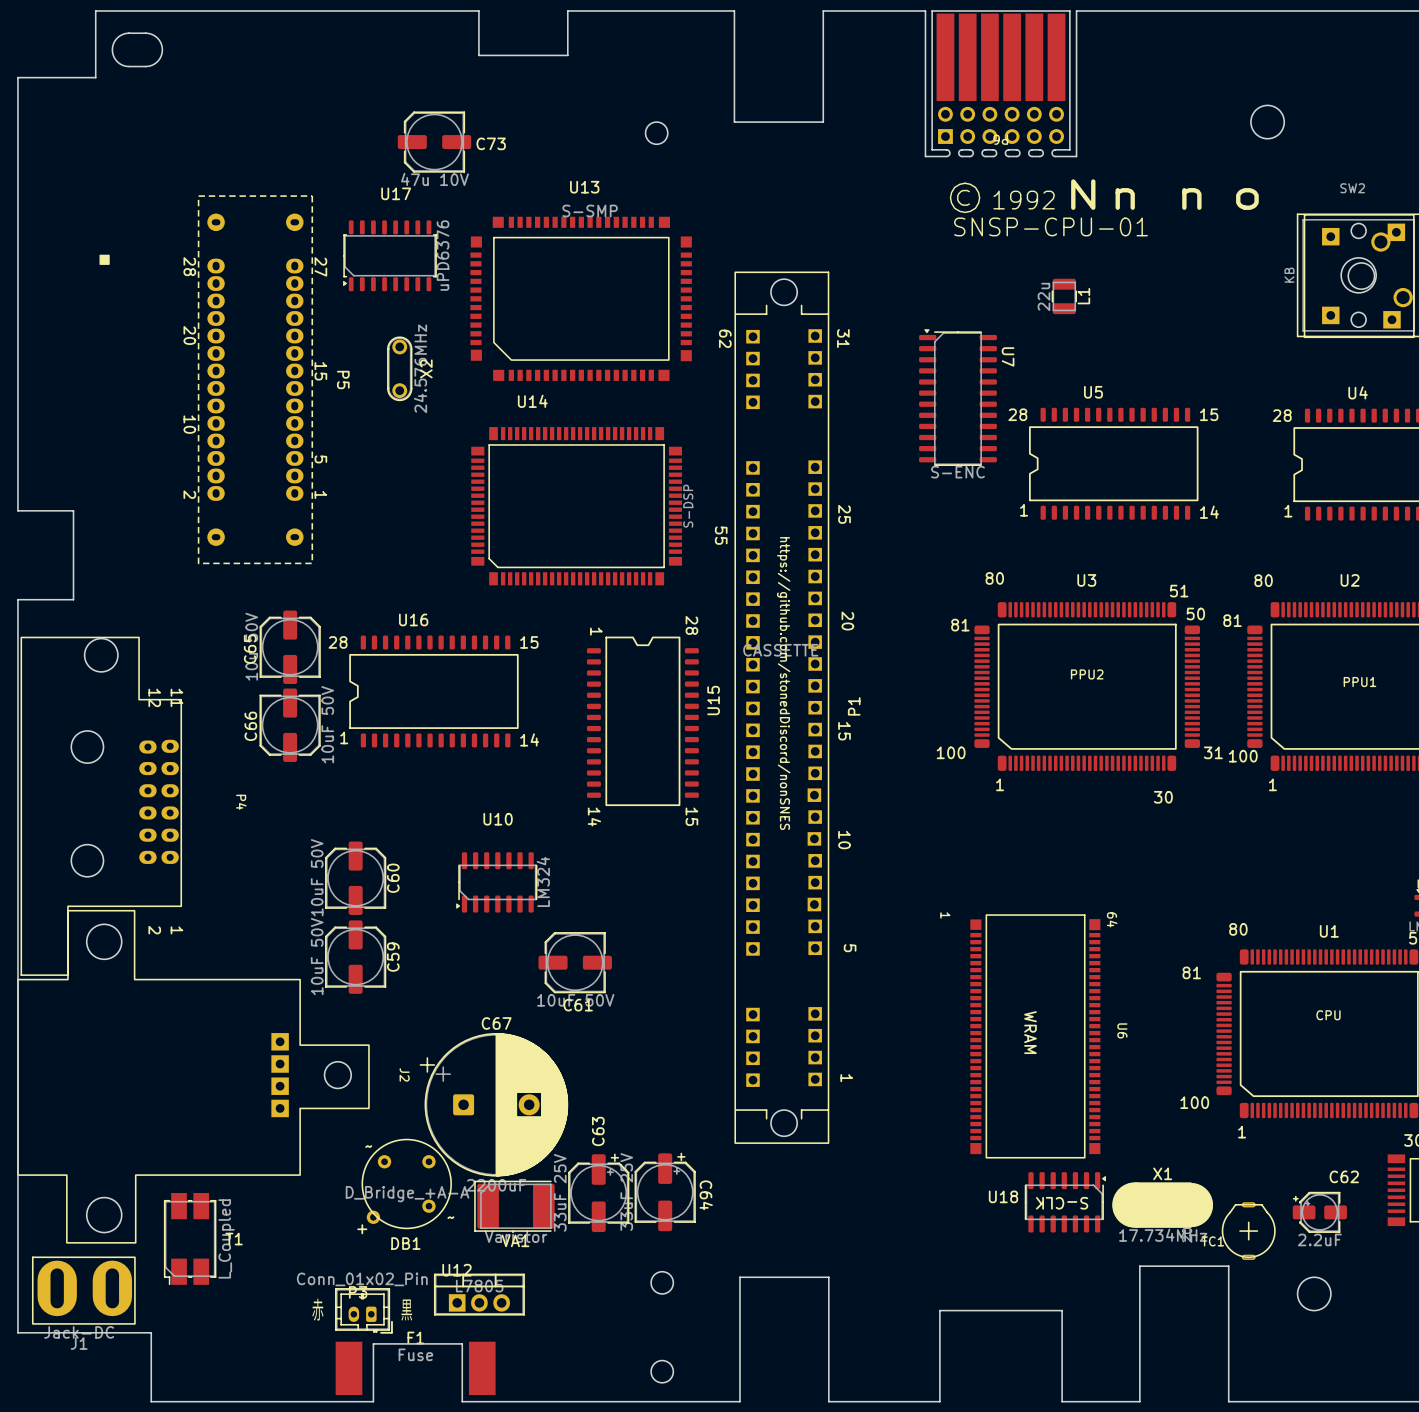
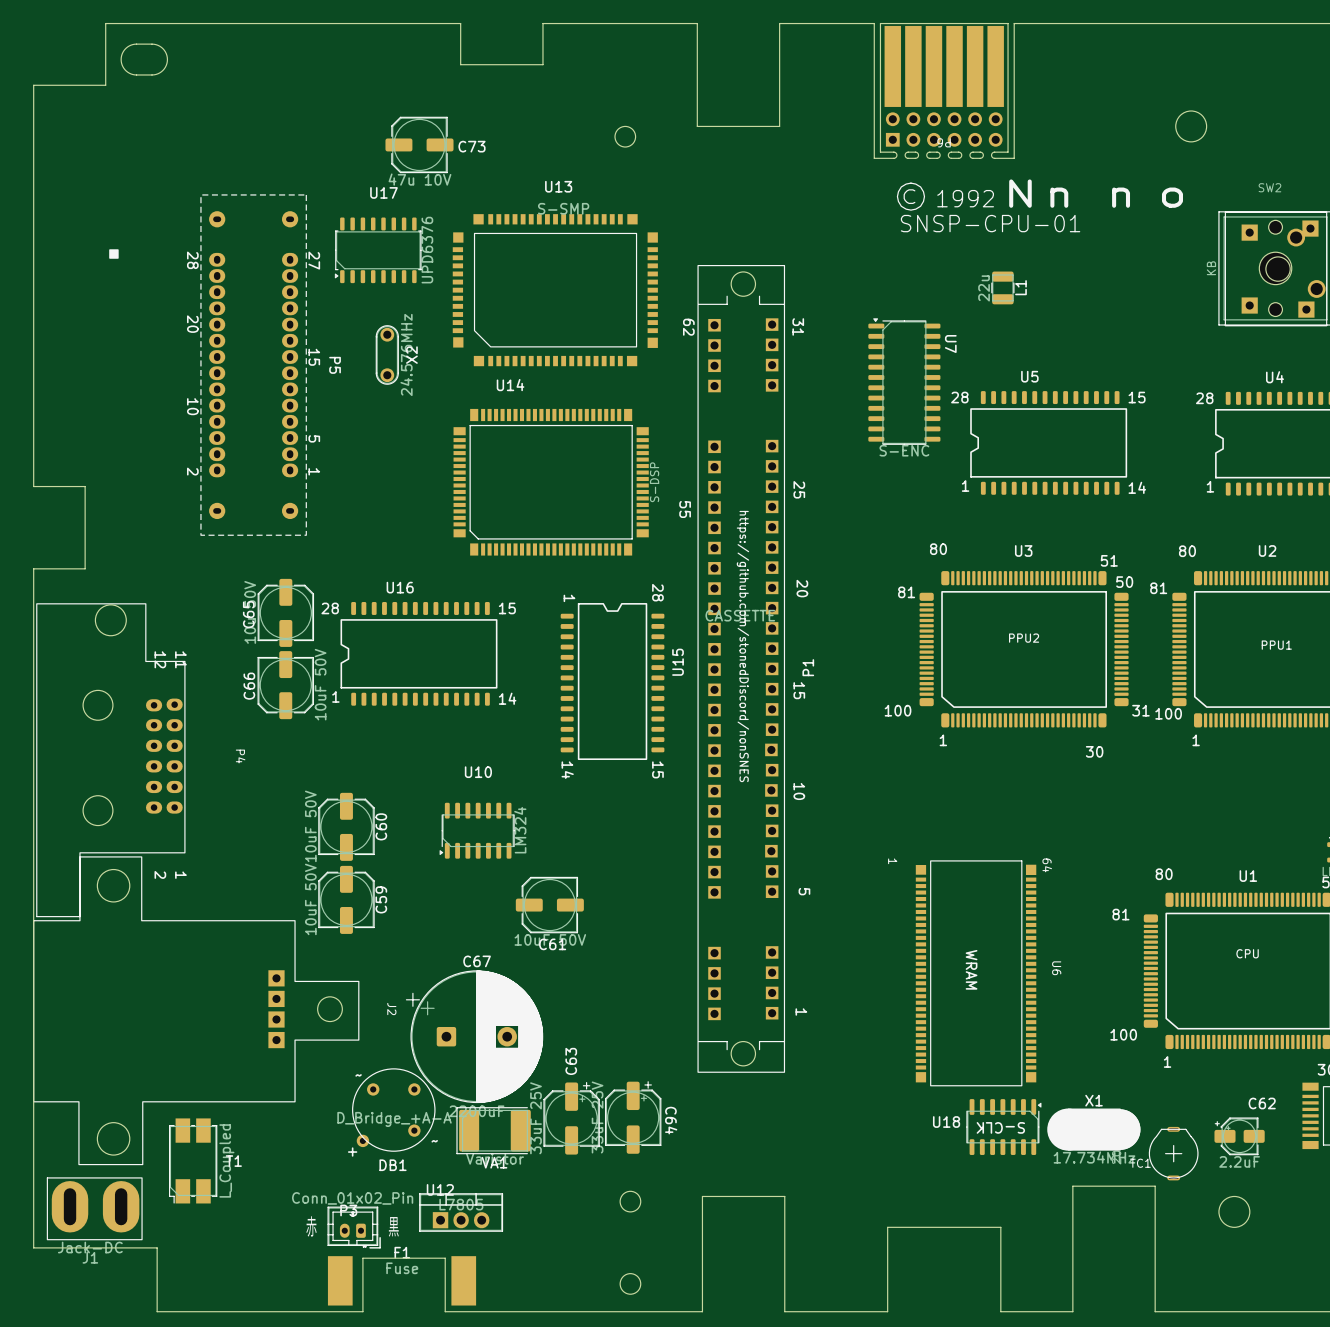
U17 value: uPD6376 (443, 255) -> UPD6376 (427, 250)

